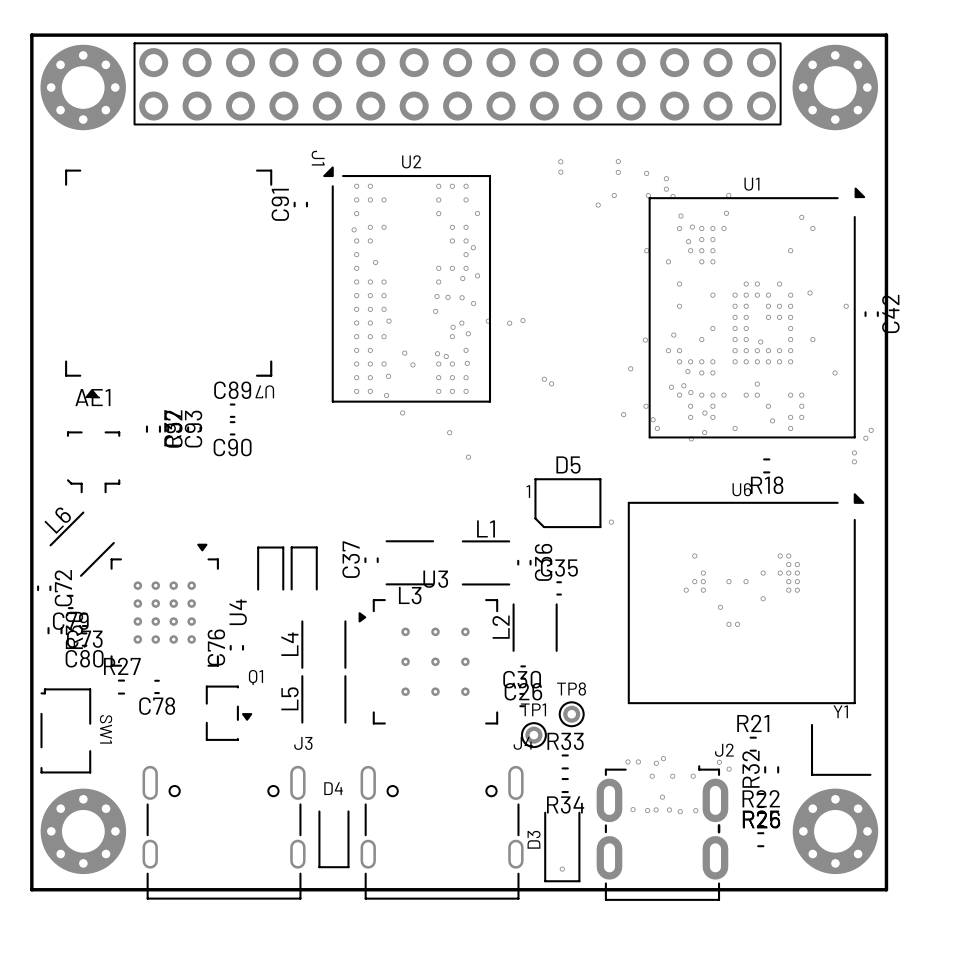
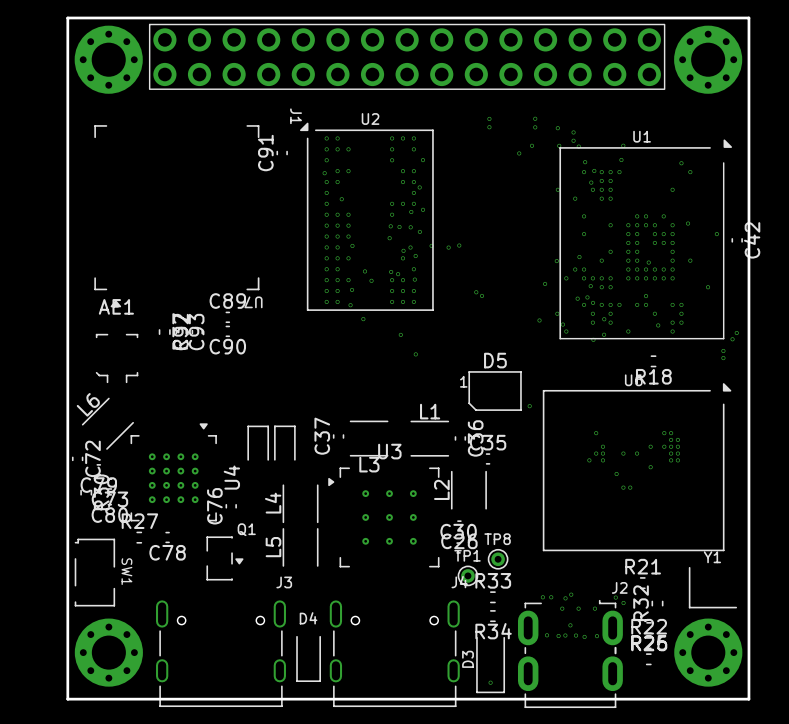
via: none -> (566, 278)

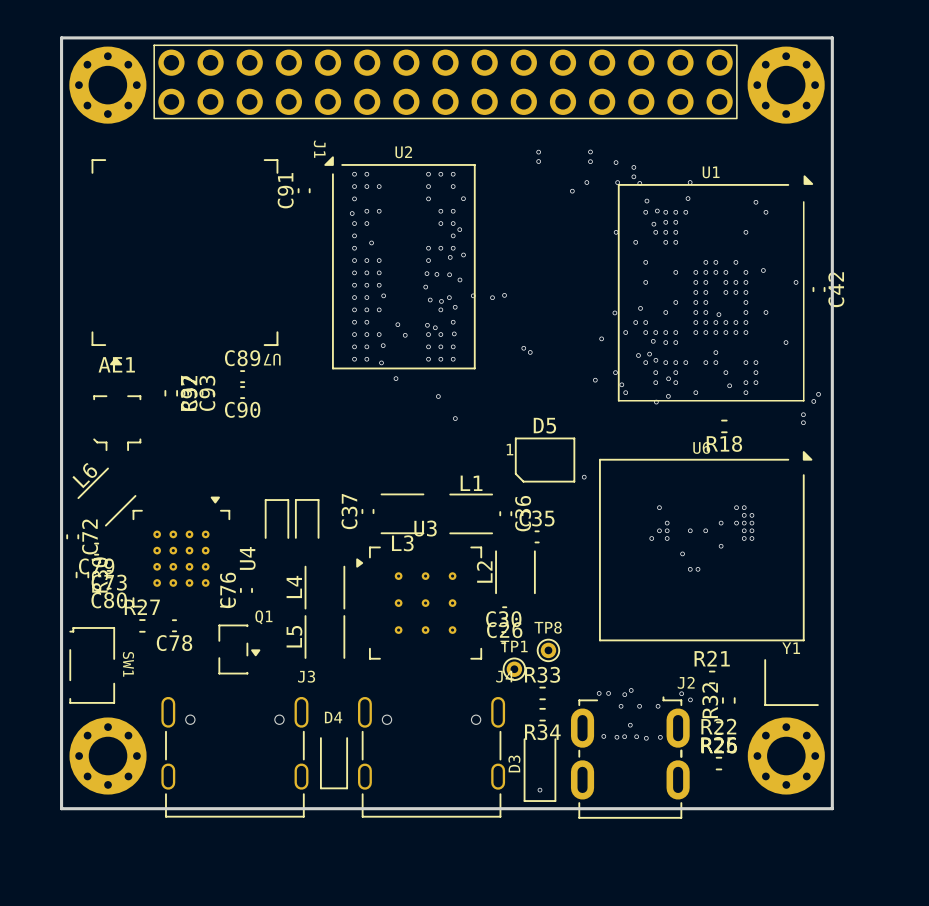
via: none -> (430, 300)

